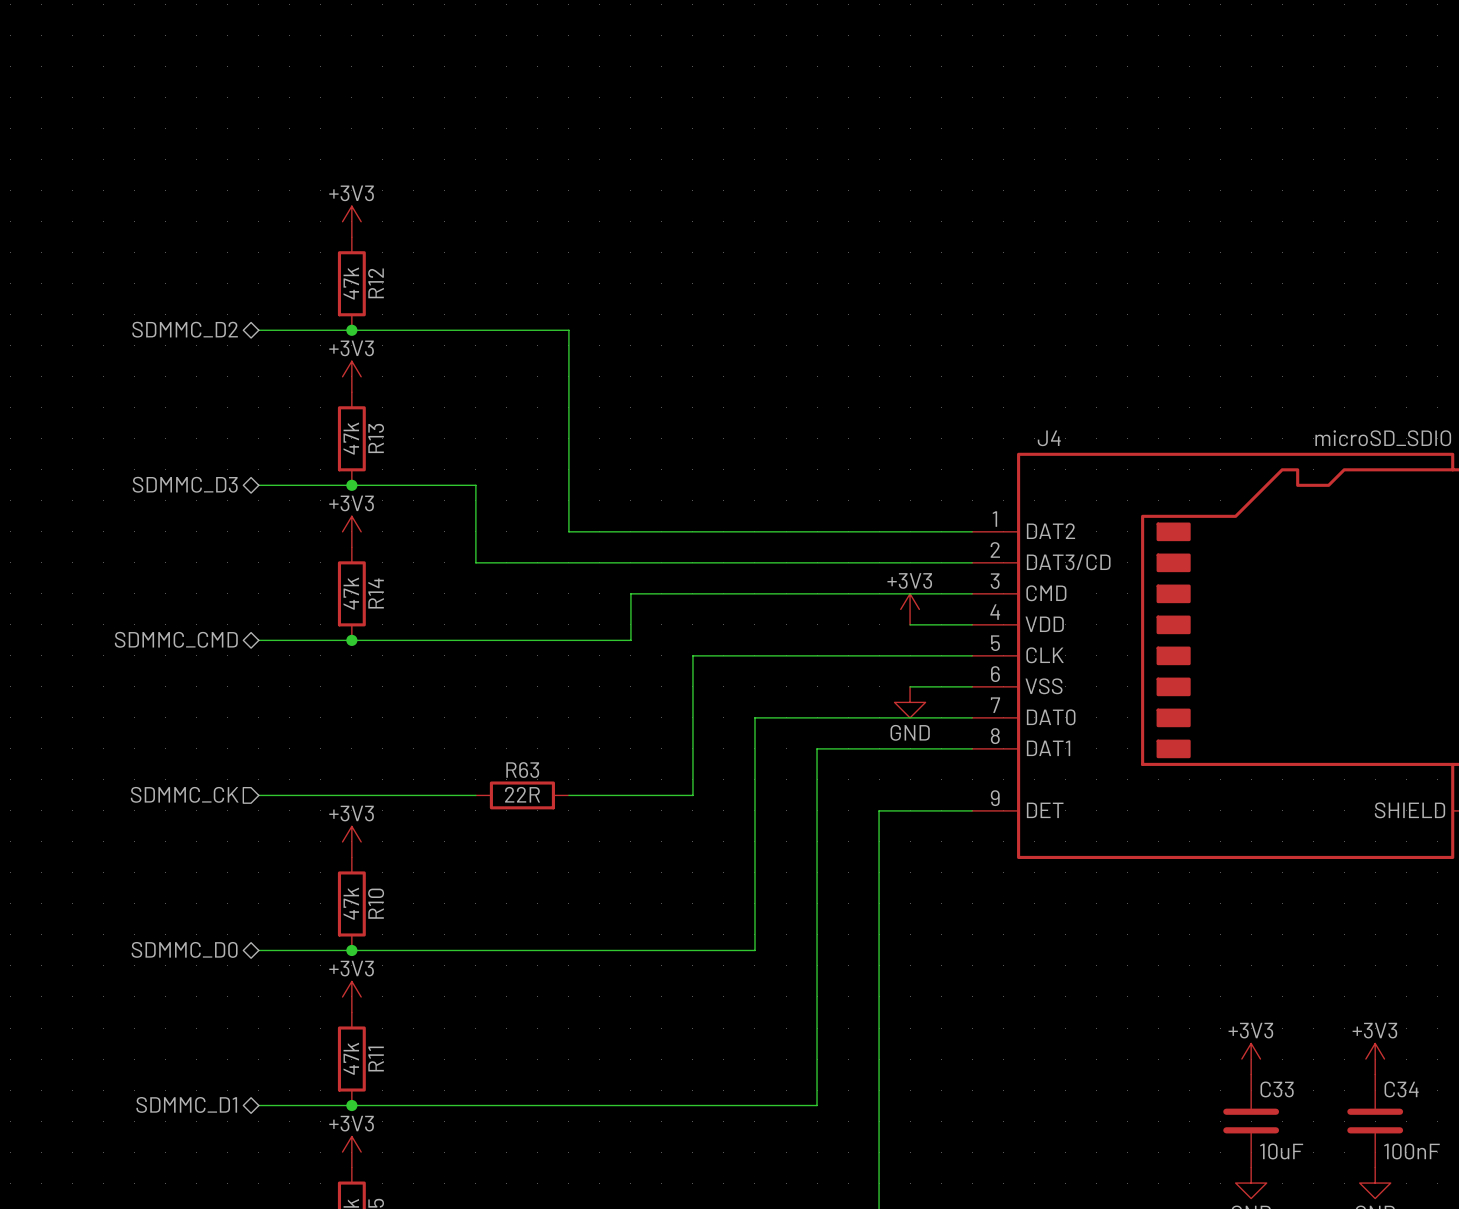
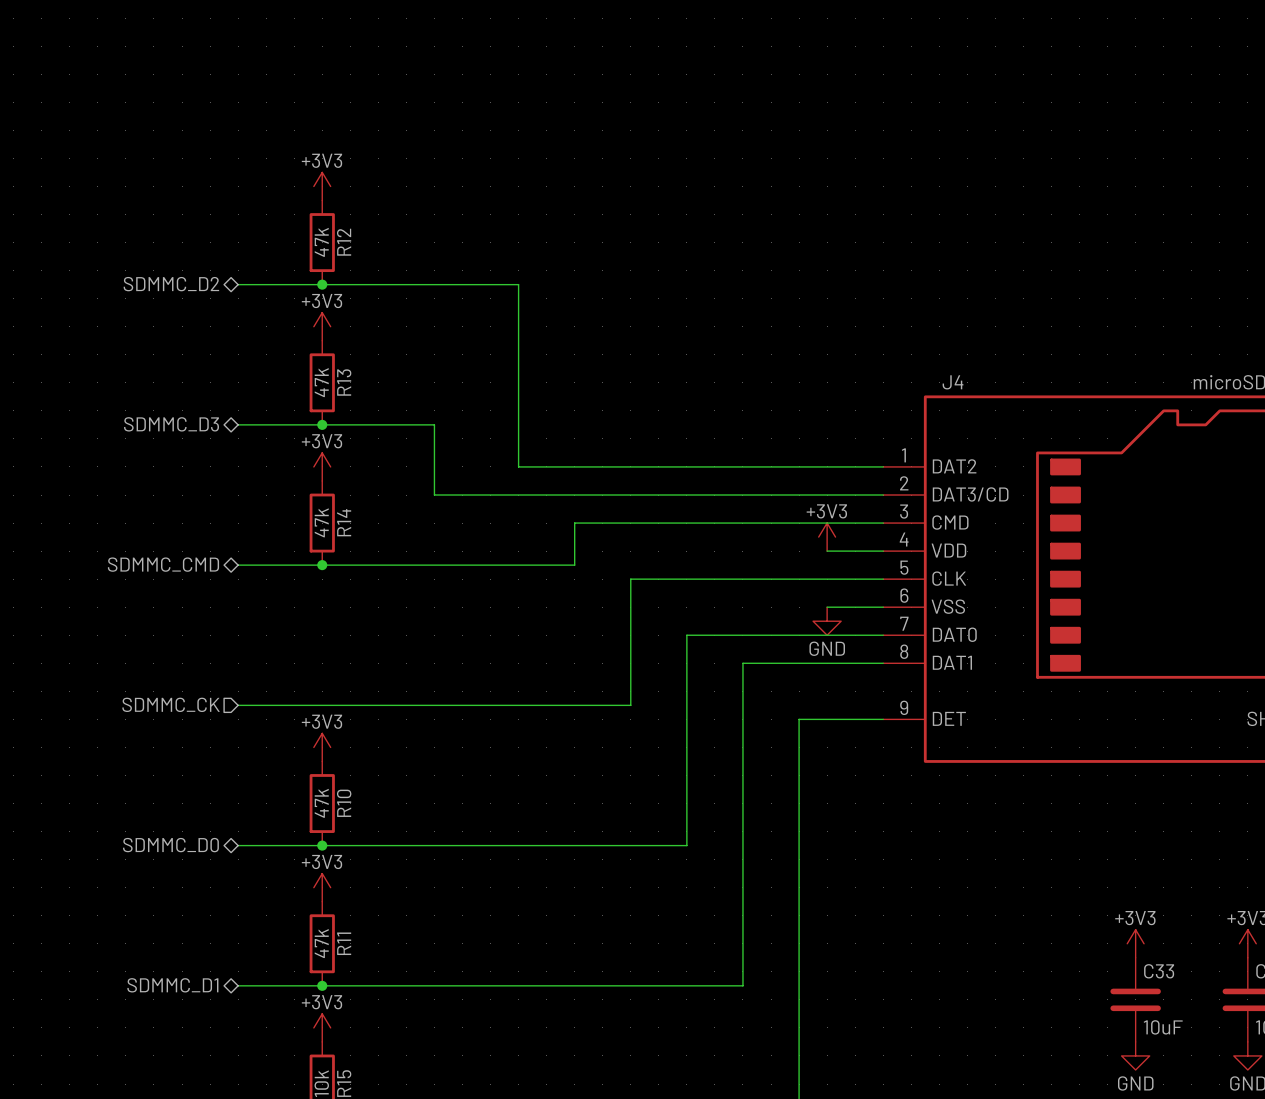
wire: none -> (434, 705) (518, 705)
R63: 22R (522, 795) -> none

